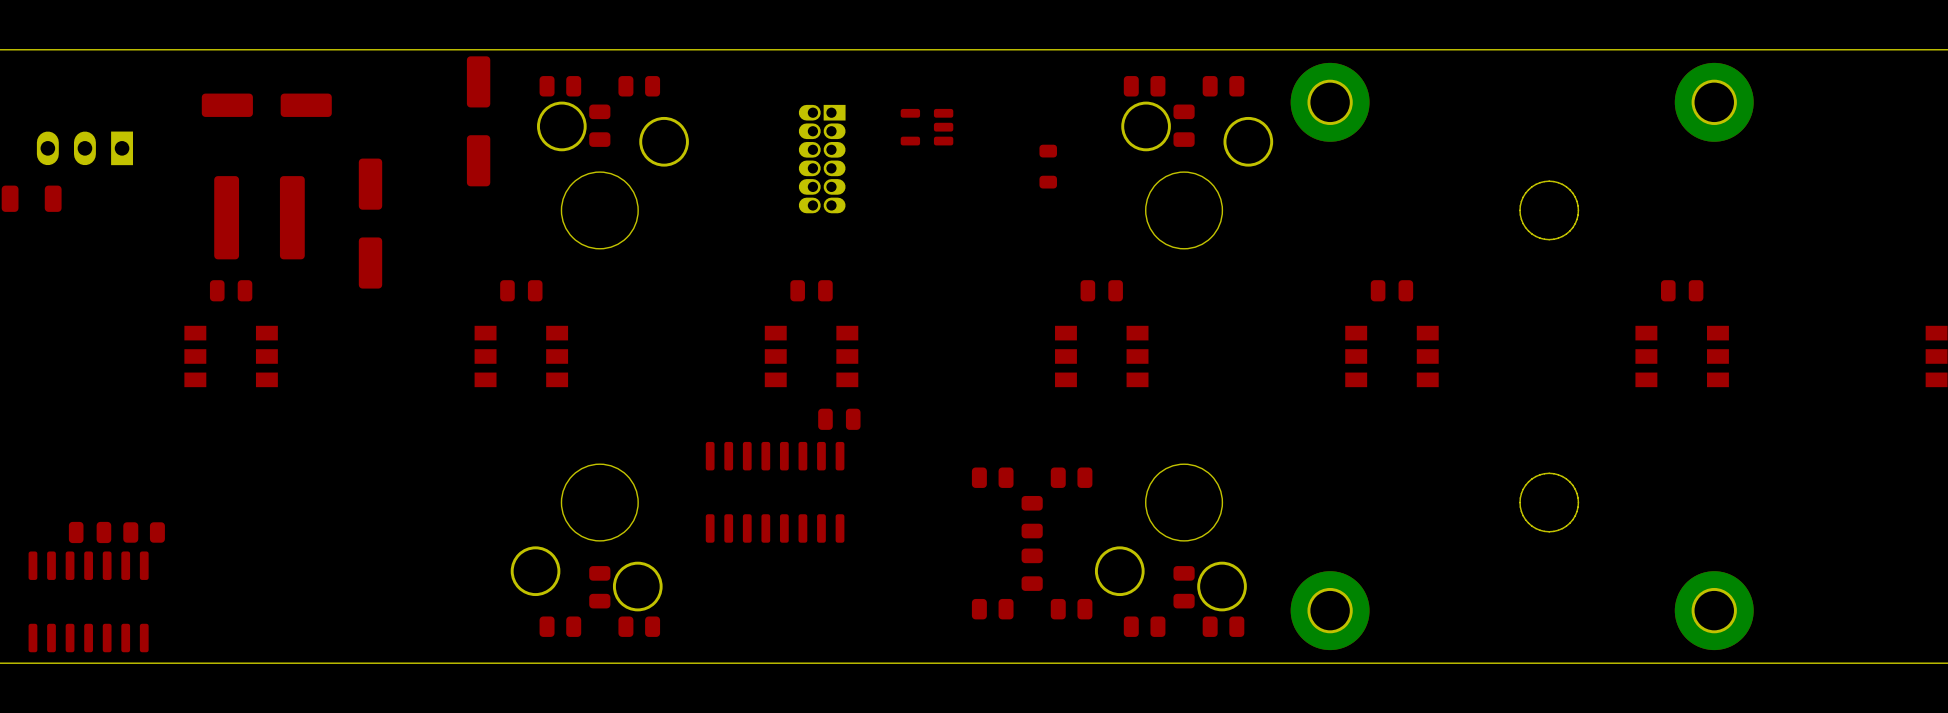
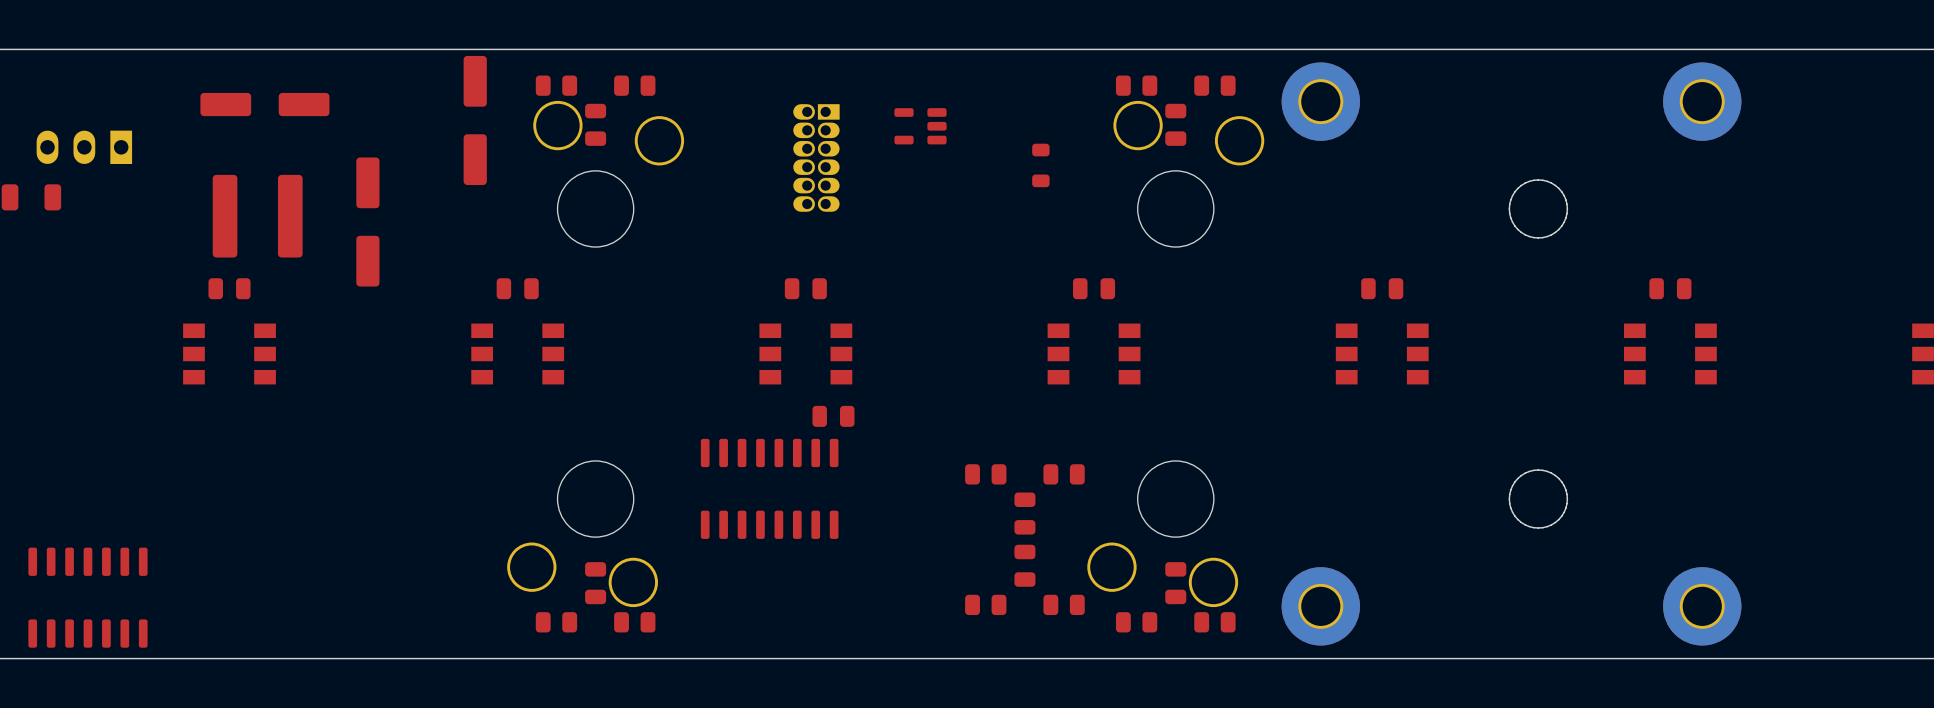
part: (90, 532) -> none
part: (144, 532) -> none

